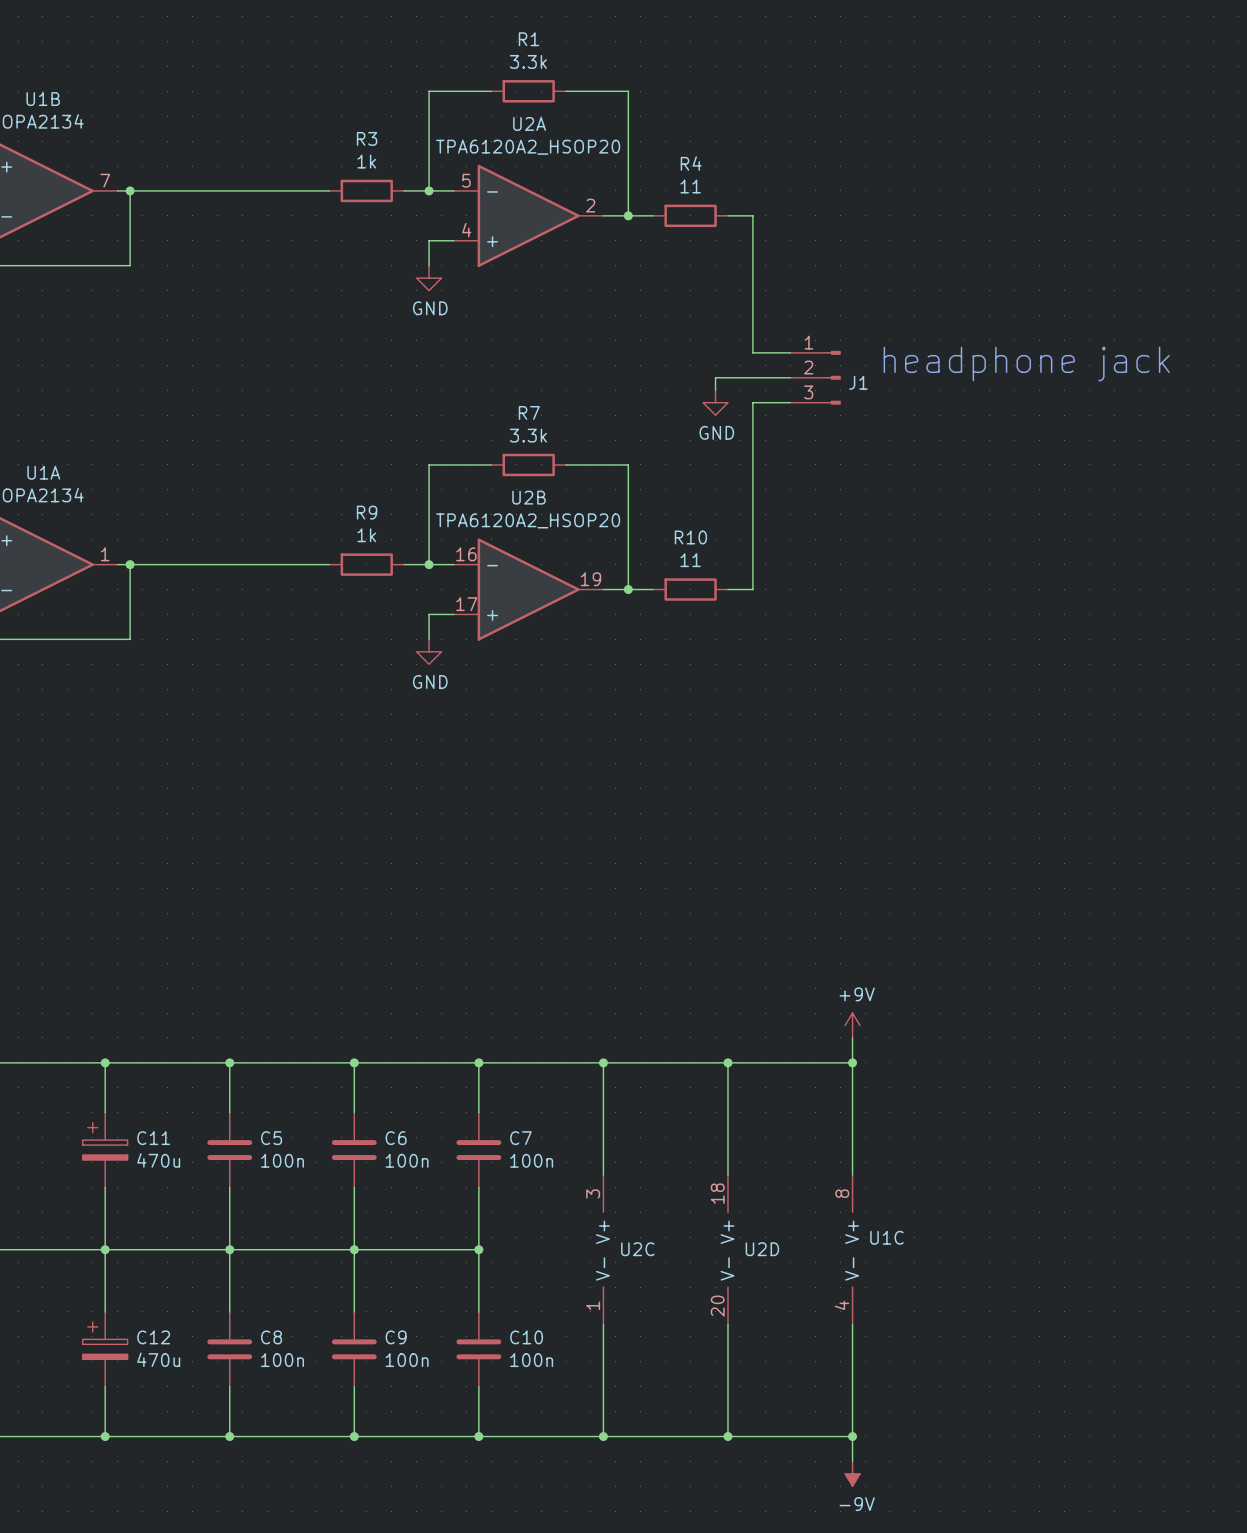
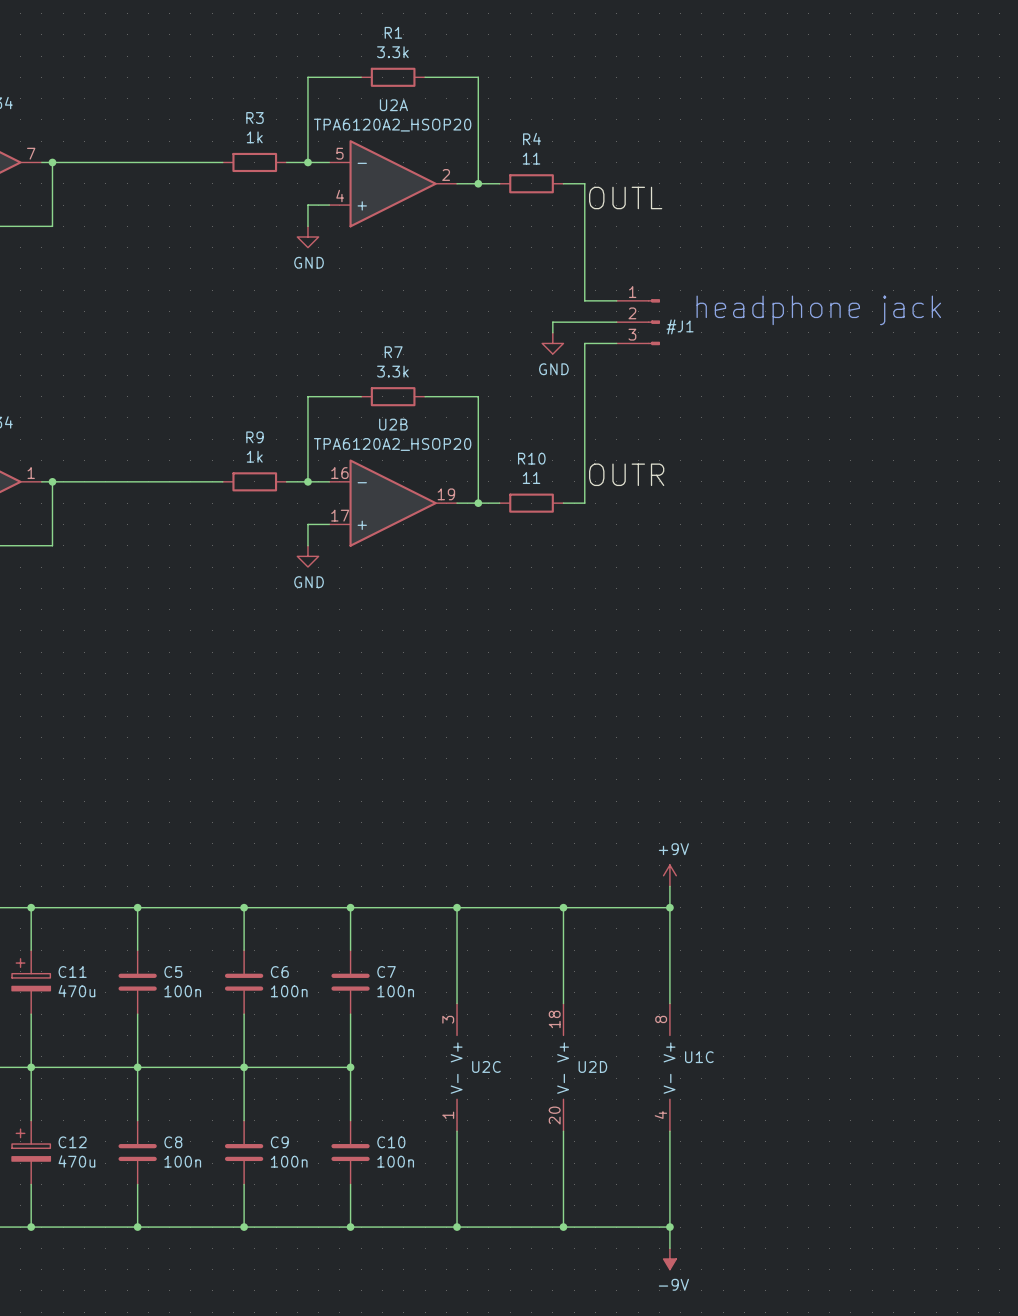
label: none -> OUTL (625, 197)
J1: (815, 377) -> none
#J1: none -> (638, 322)
label: none -> OUTR (626, 474)

